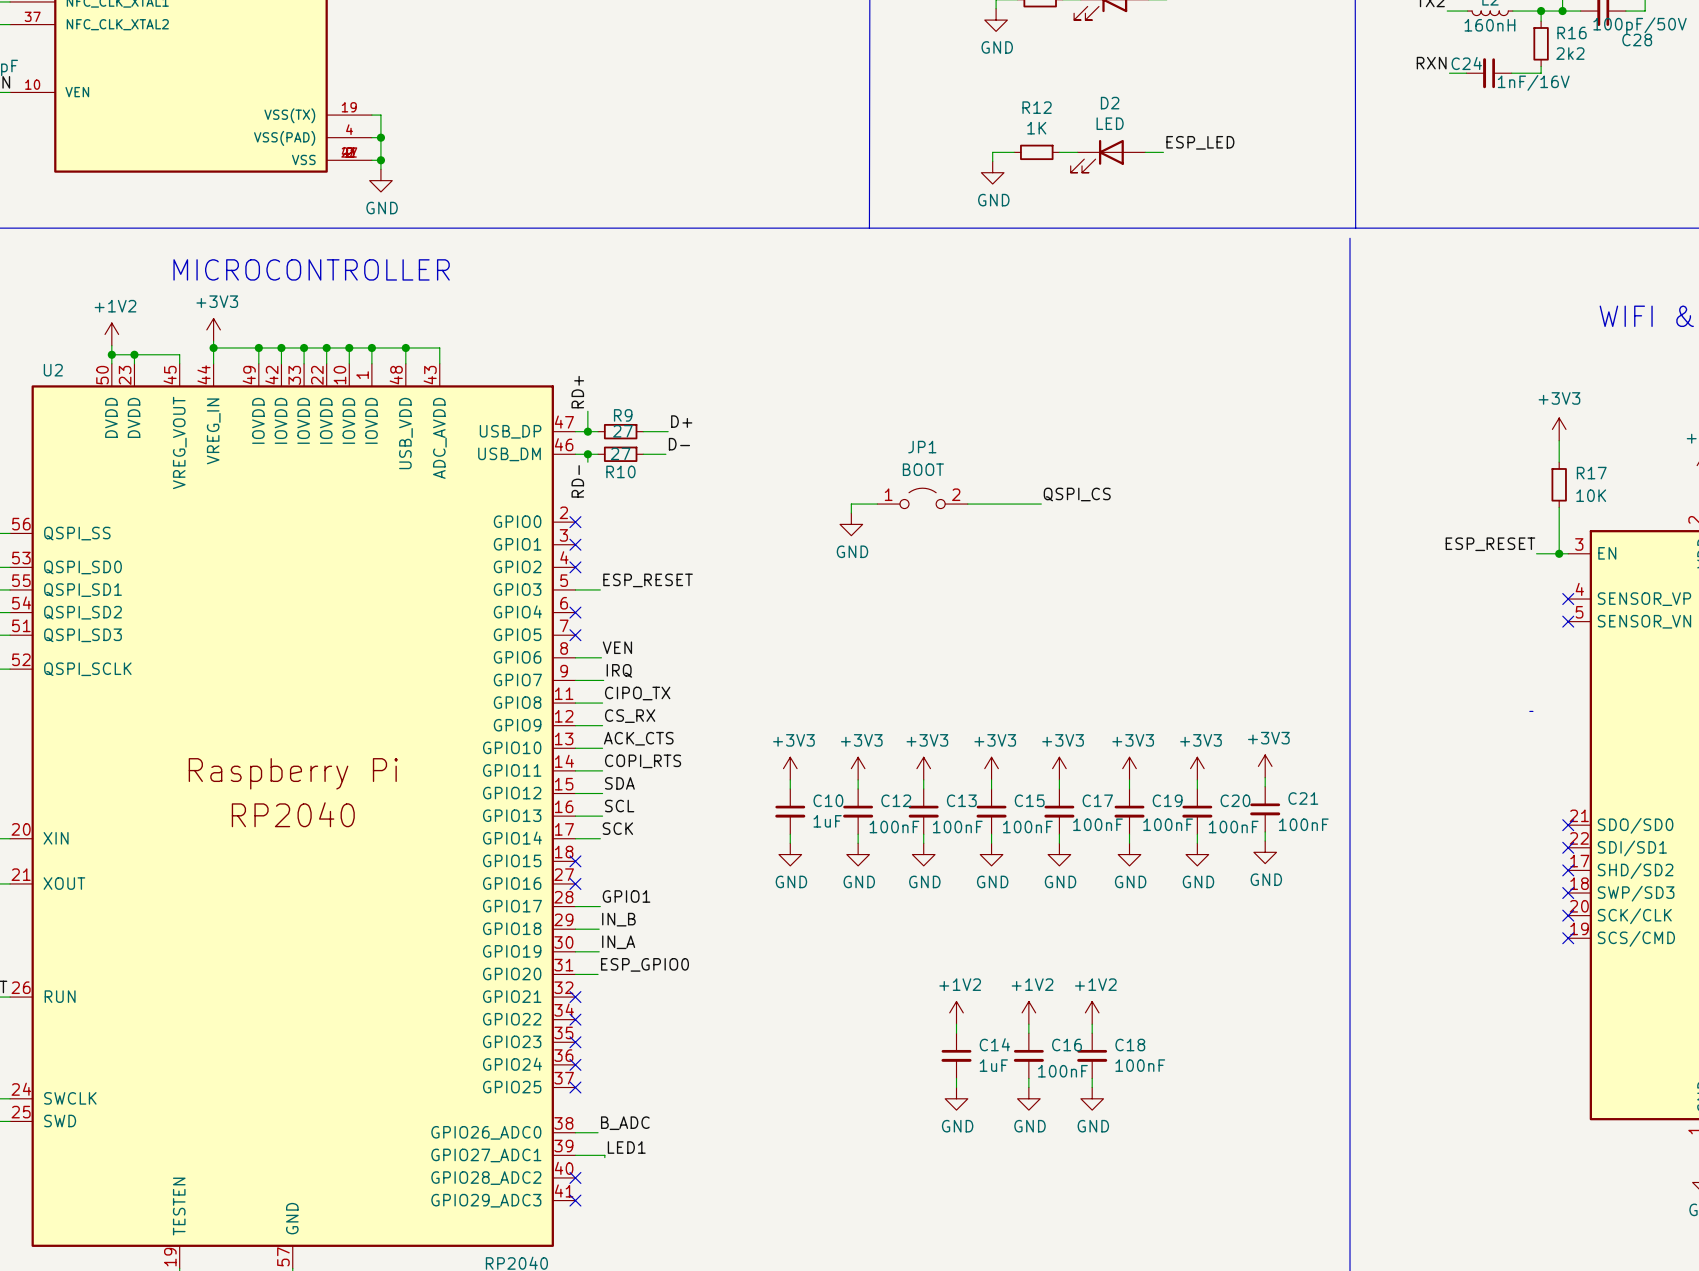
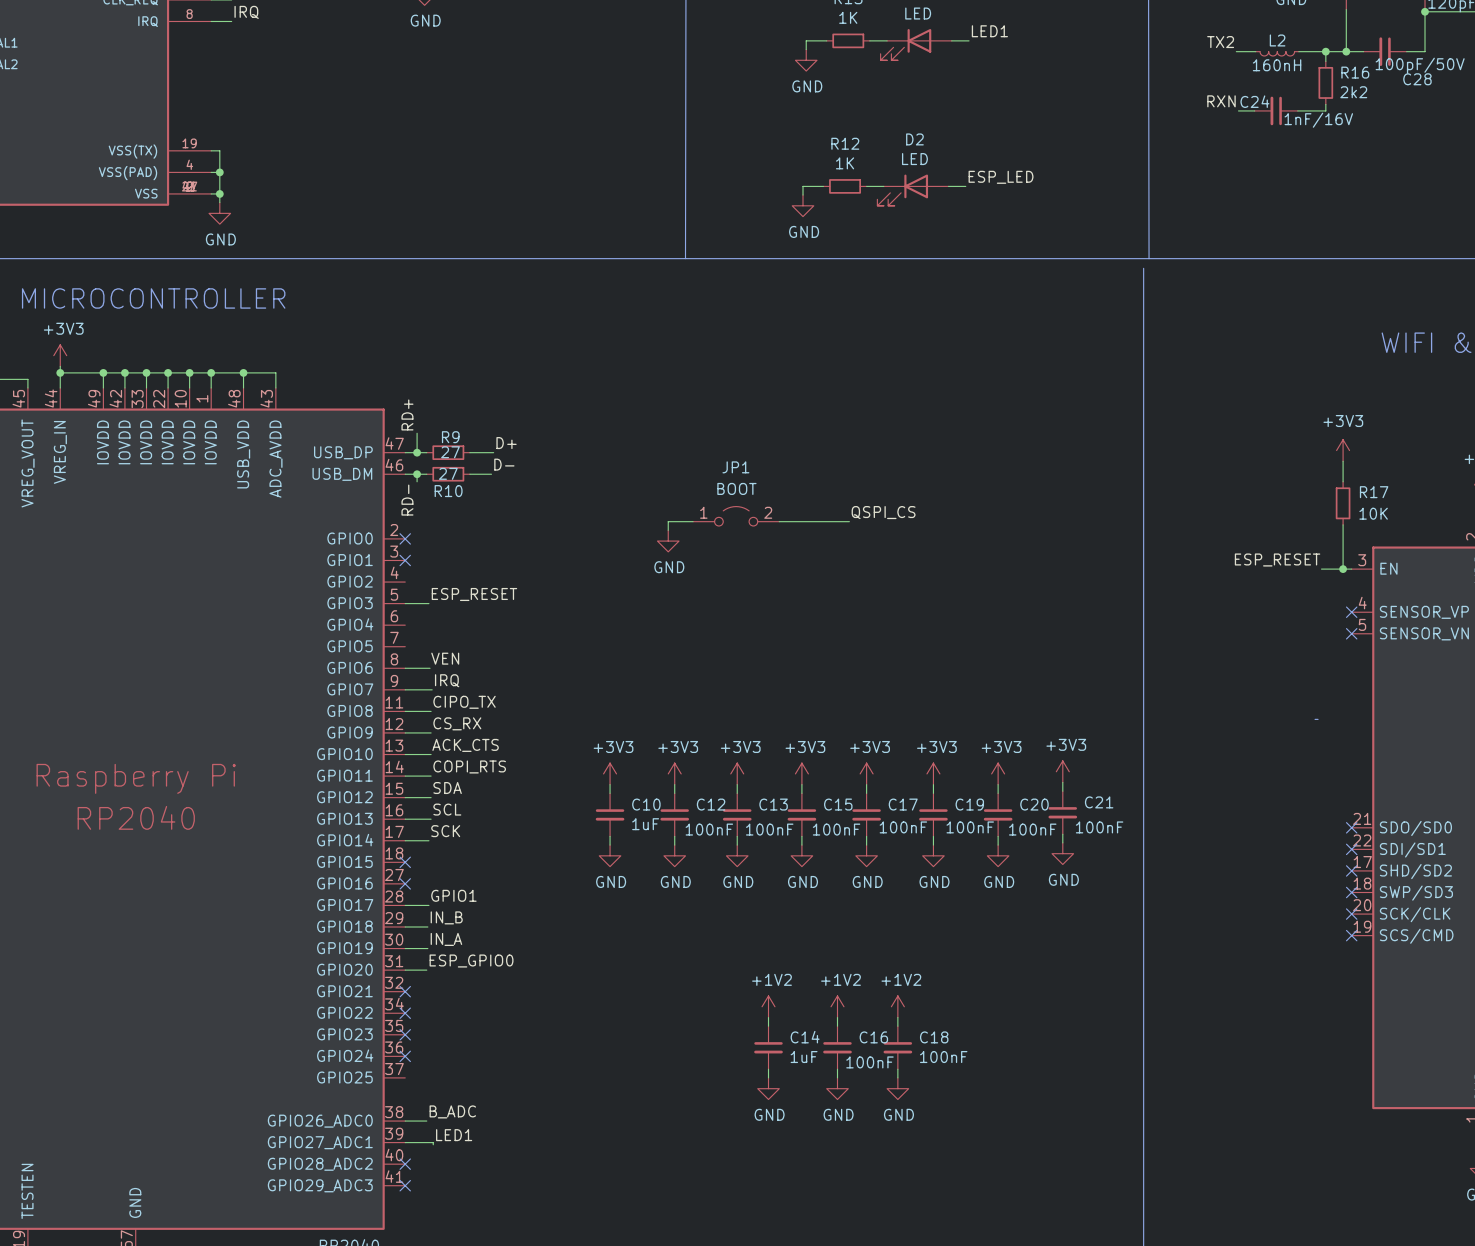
no-connect mark: (575, 567) -> none
no-connect mark: (575, 612) -> none
no-connect mark: (575, 635) -> none
no-connect mark: (575, 1087) -> none

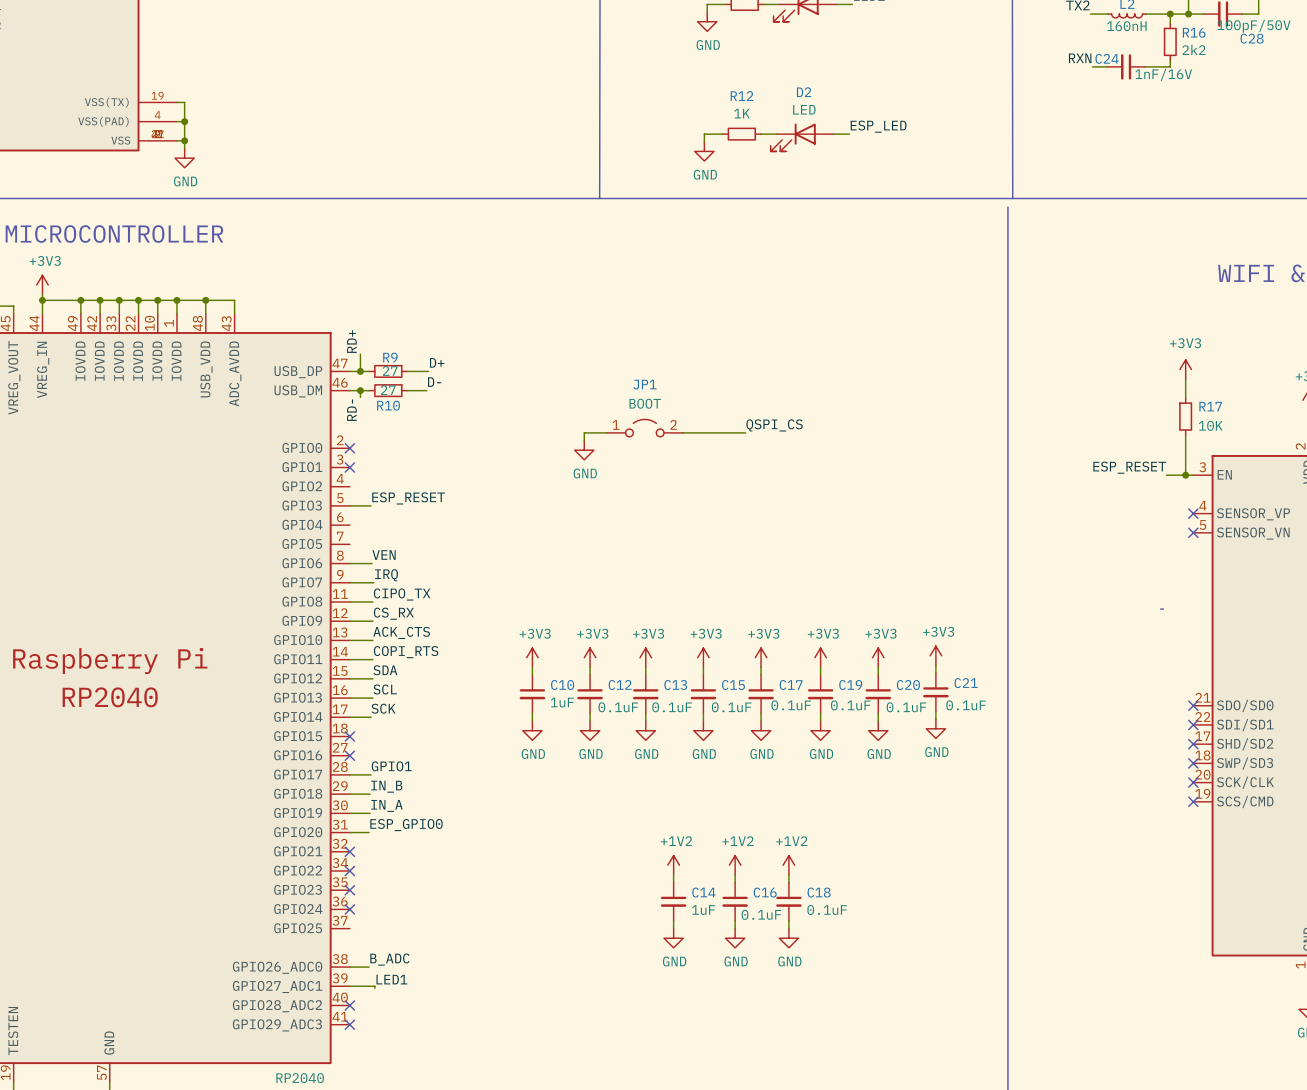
C17 value: 100nF (903, 827) -> 0.1uF (791, 705)
C19 value: 100nF (970, 827) -> 0.1uF (850, 705)
C21 value: 100nF (1099, 827) -> 0.1uF (966, 705)
C12 value: 100nF (709, 829) -> 0.1uF (618, 707)
C13 value: 100nF (769, 829) -> 0.1uF (672, 707)
C15 value: 100nF (836, 829) -> 0.1uF (731, 707)
C20 value: 100nF (1032, 829) -> 0.1uF (906, 707)
C18 value: 100nF (943, 1057) -> 0.1uF (827, 910)
C16 value: 100nF (869, 1062) -> 0.1uF (761, 914)

